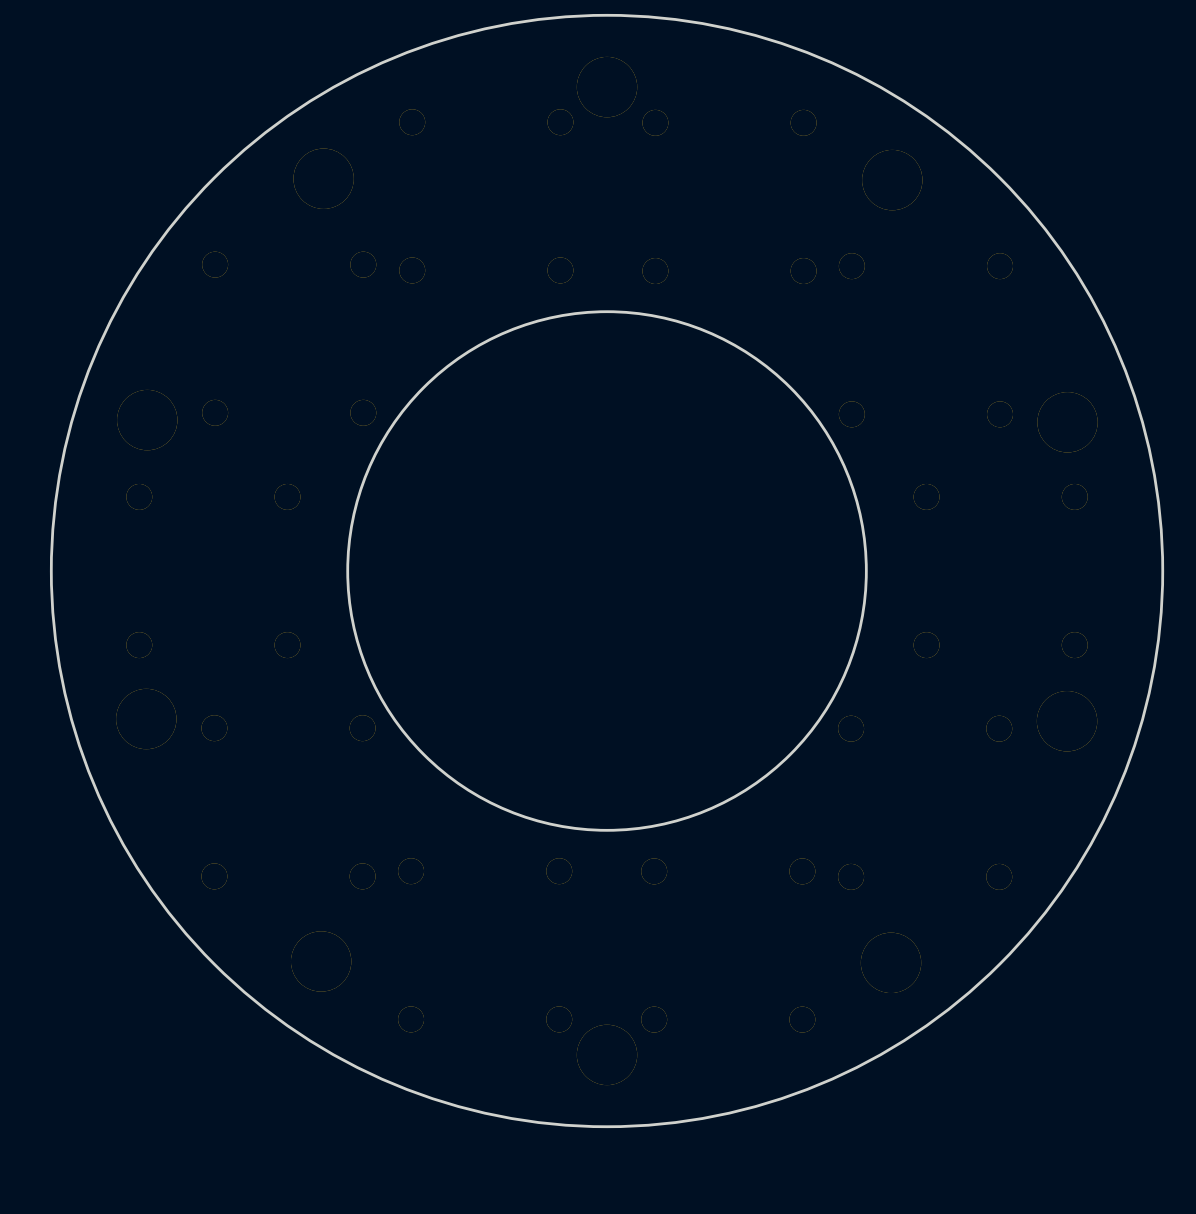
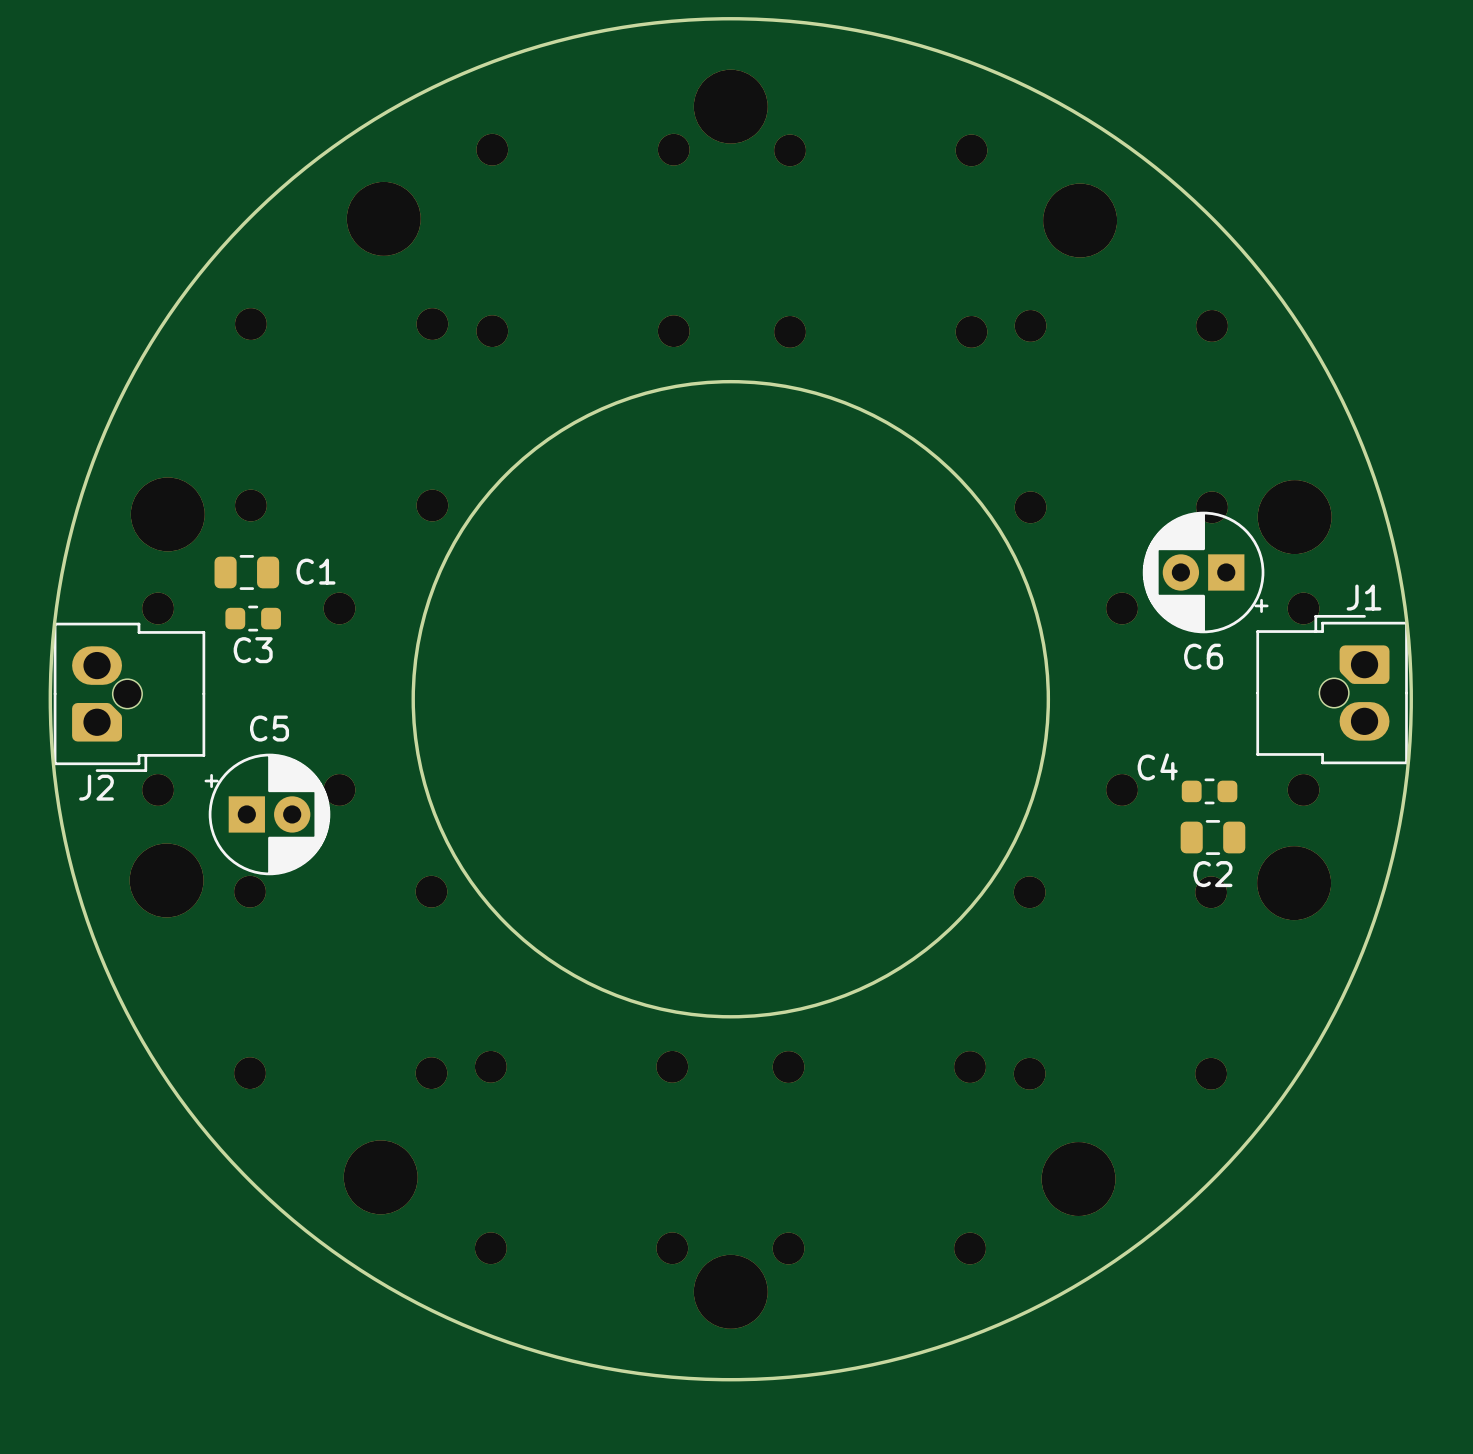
C1: none -> (246, 572)
C6: none -> (1205, 572)
C3: none -> (253, 618)
J1: none -> (1332, 689)
J2: none -> (129, 697)
C4: none -> (1209, 791)
C5: none -> (267, 814)
C2: none -> (1212, 837)

